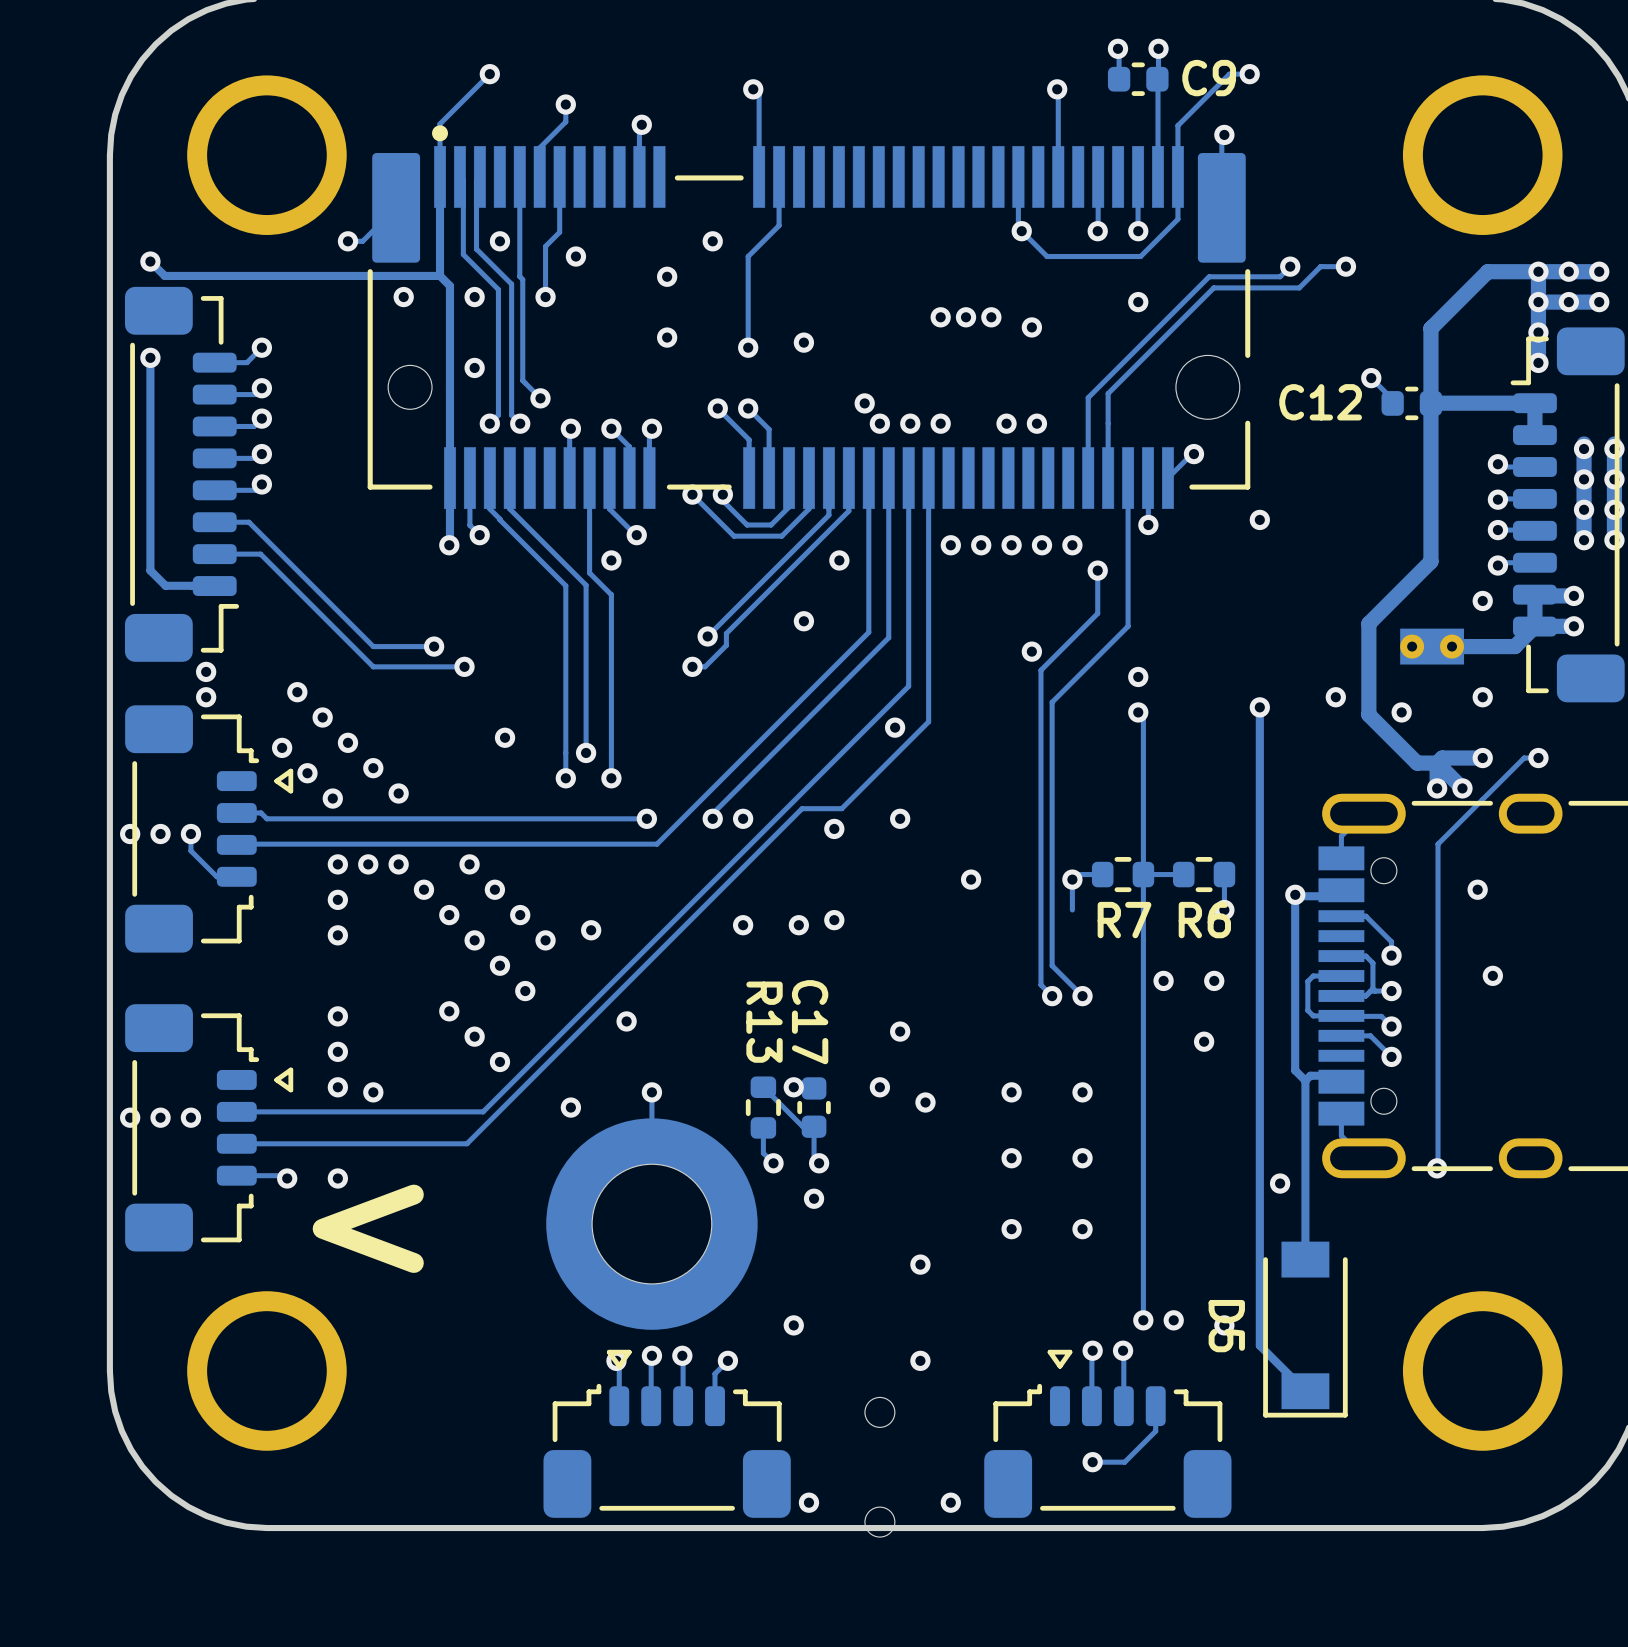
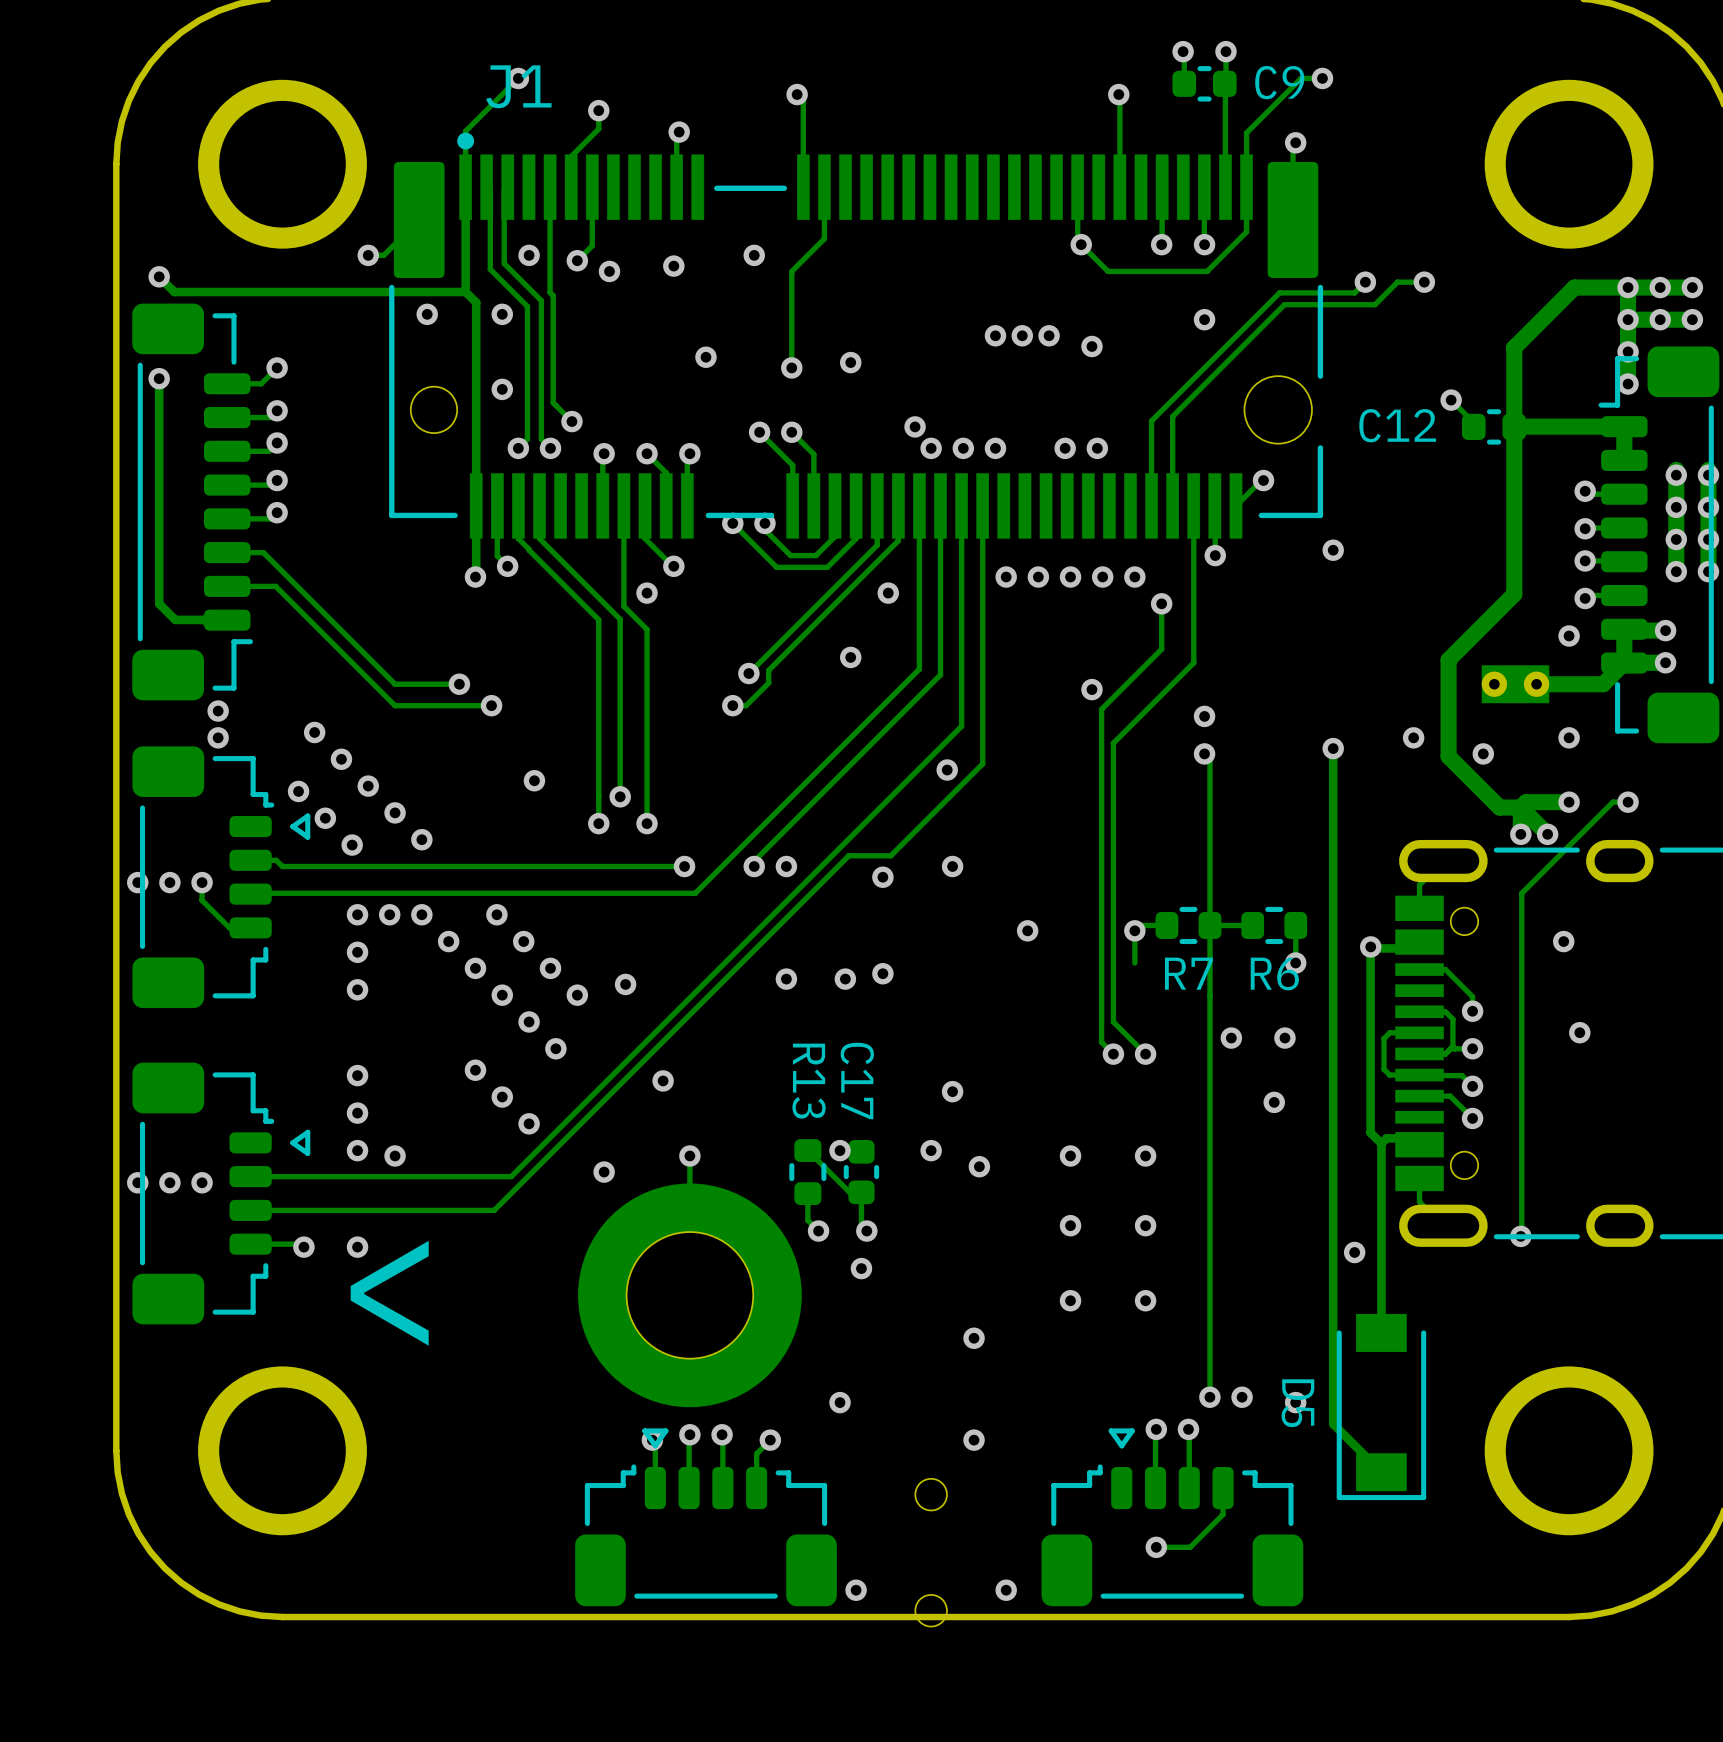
J1 name: none -> J1 (518, 86)
track: (545, 246) (545, 297) -> none
via: none -> (577, 260)
via position: (667, 276) -> (673, 266)
via: (545, 297) -> none

